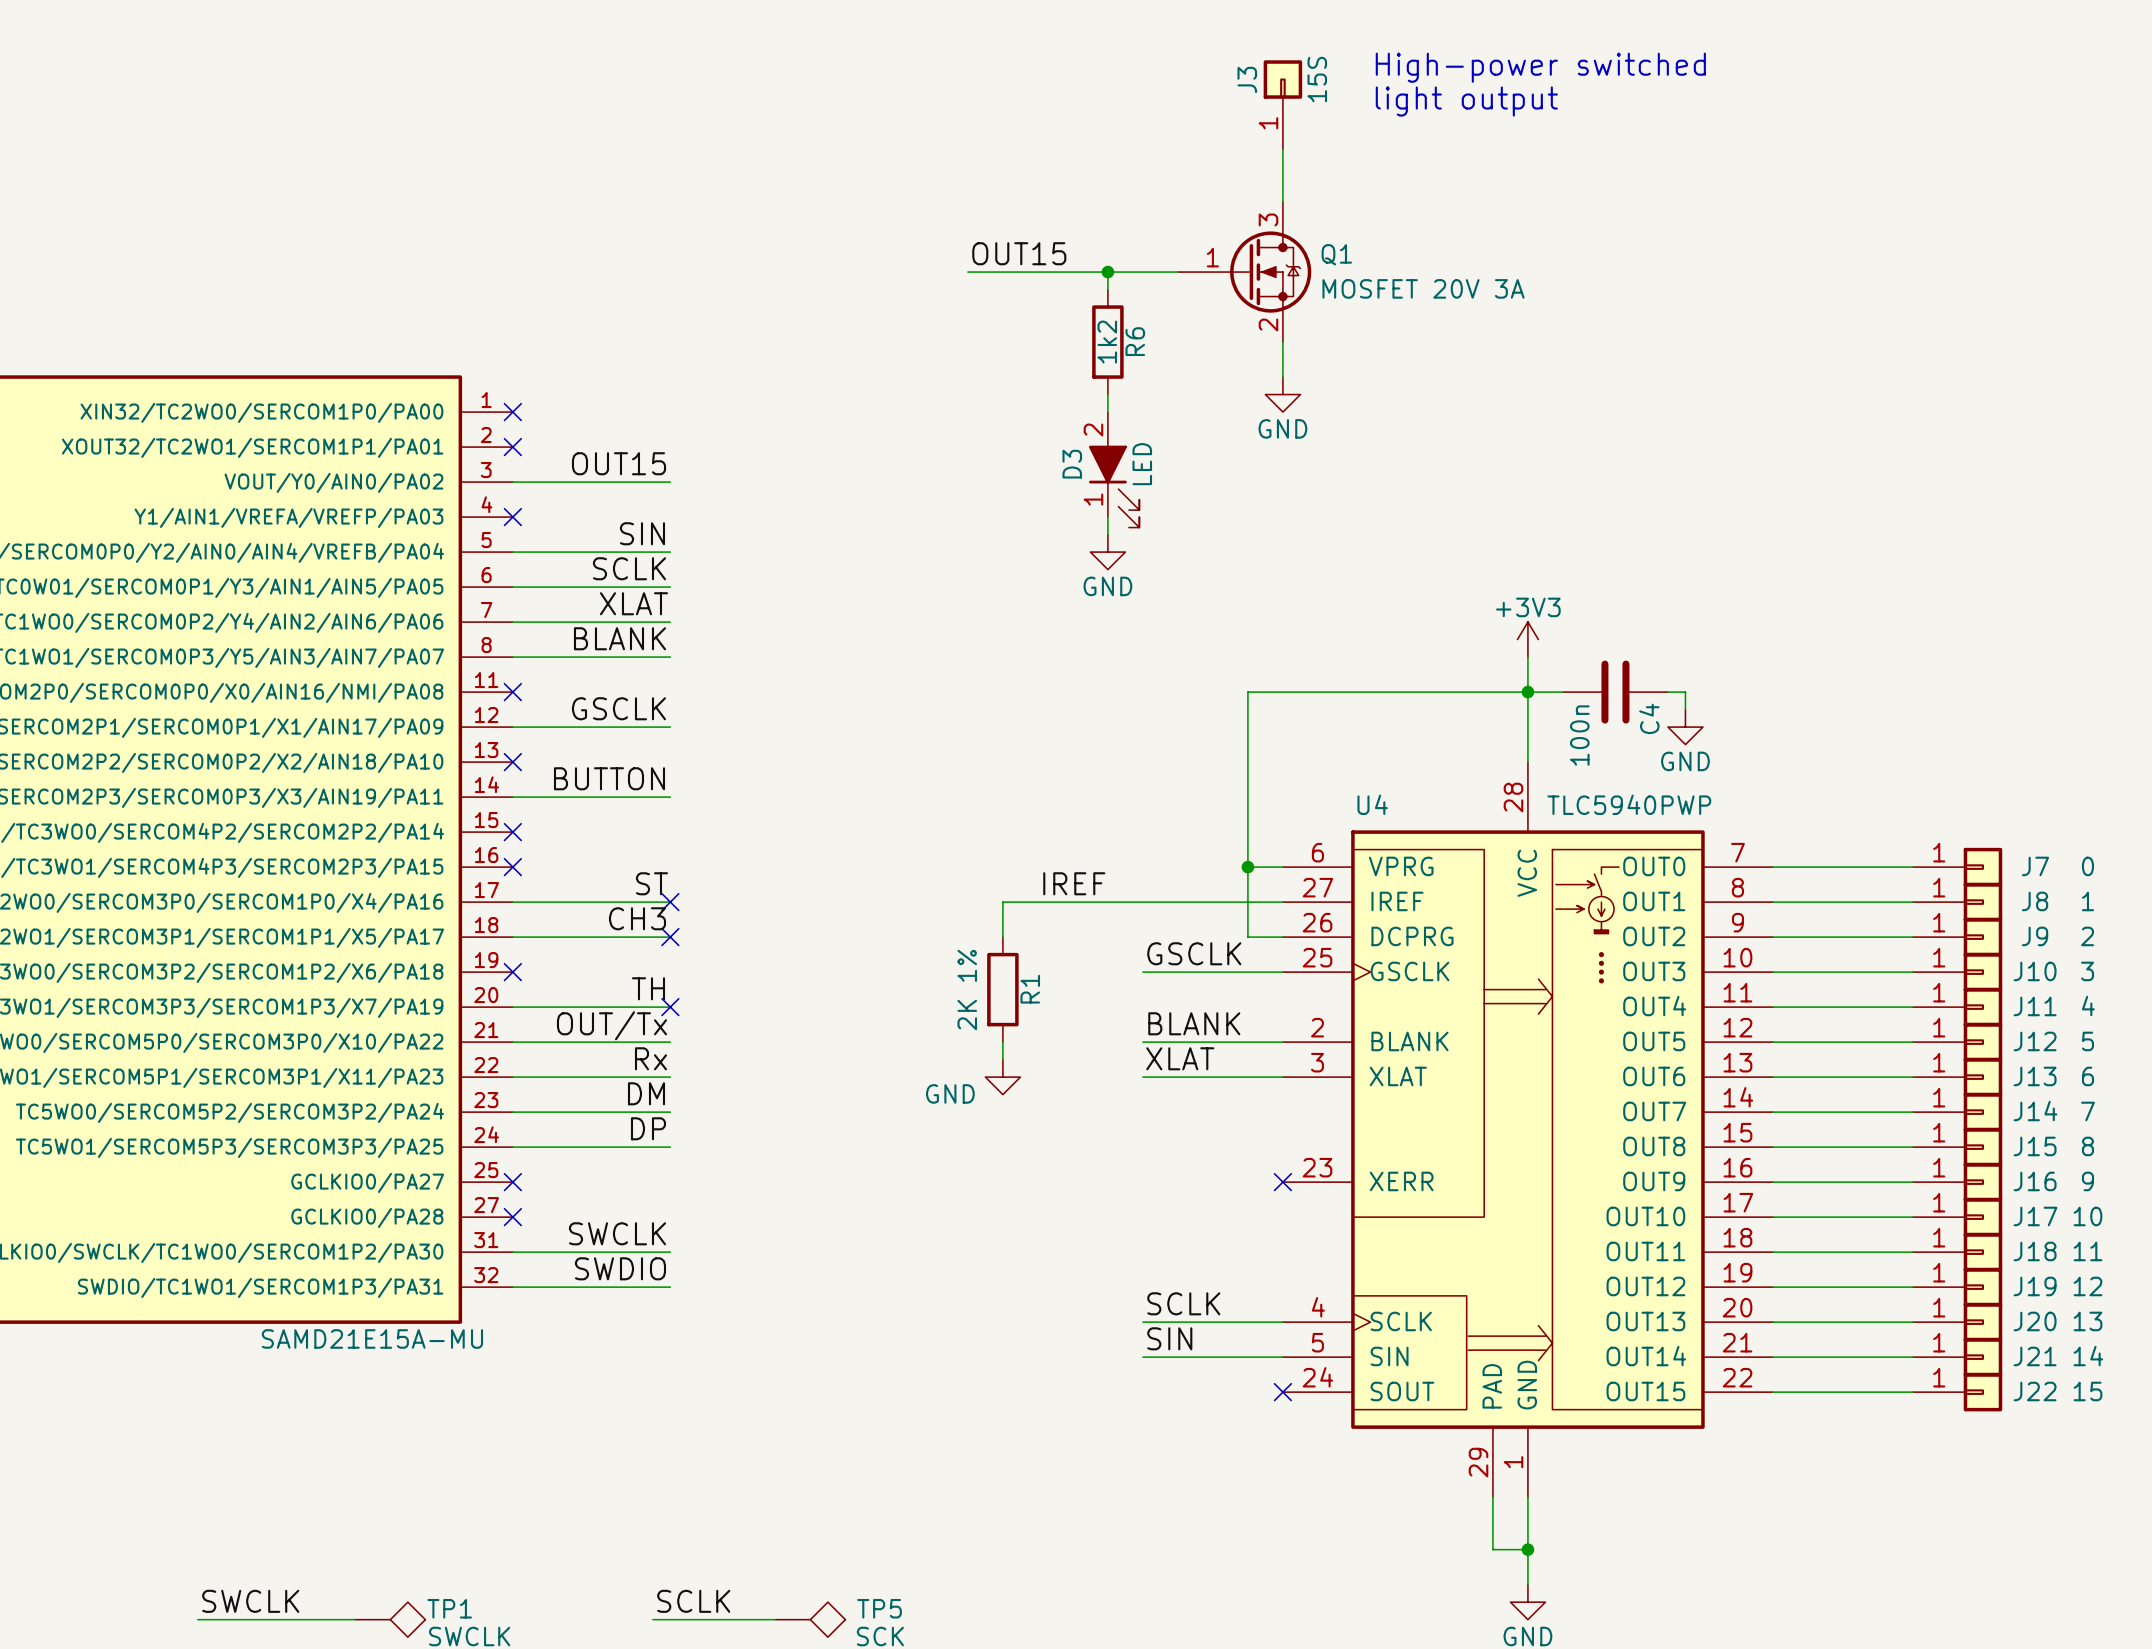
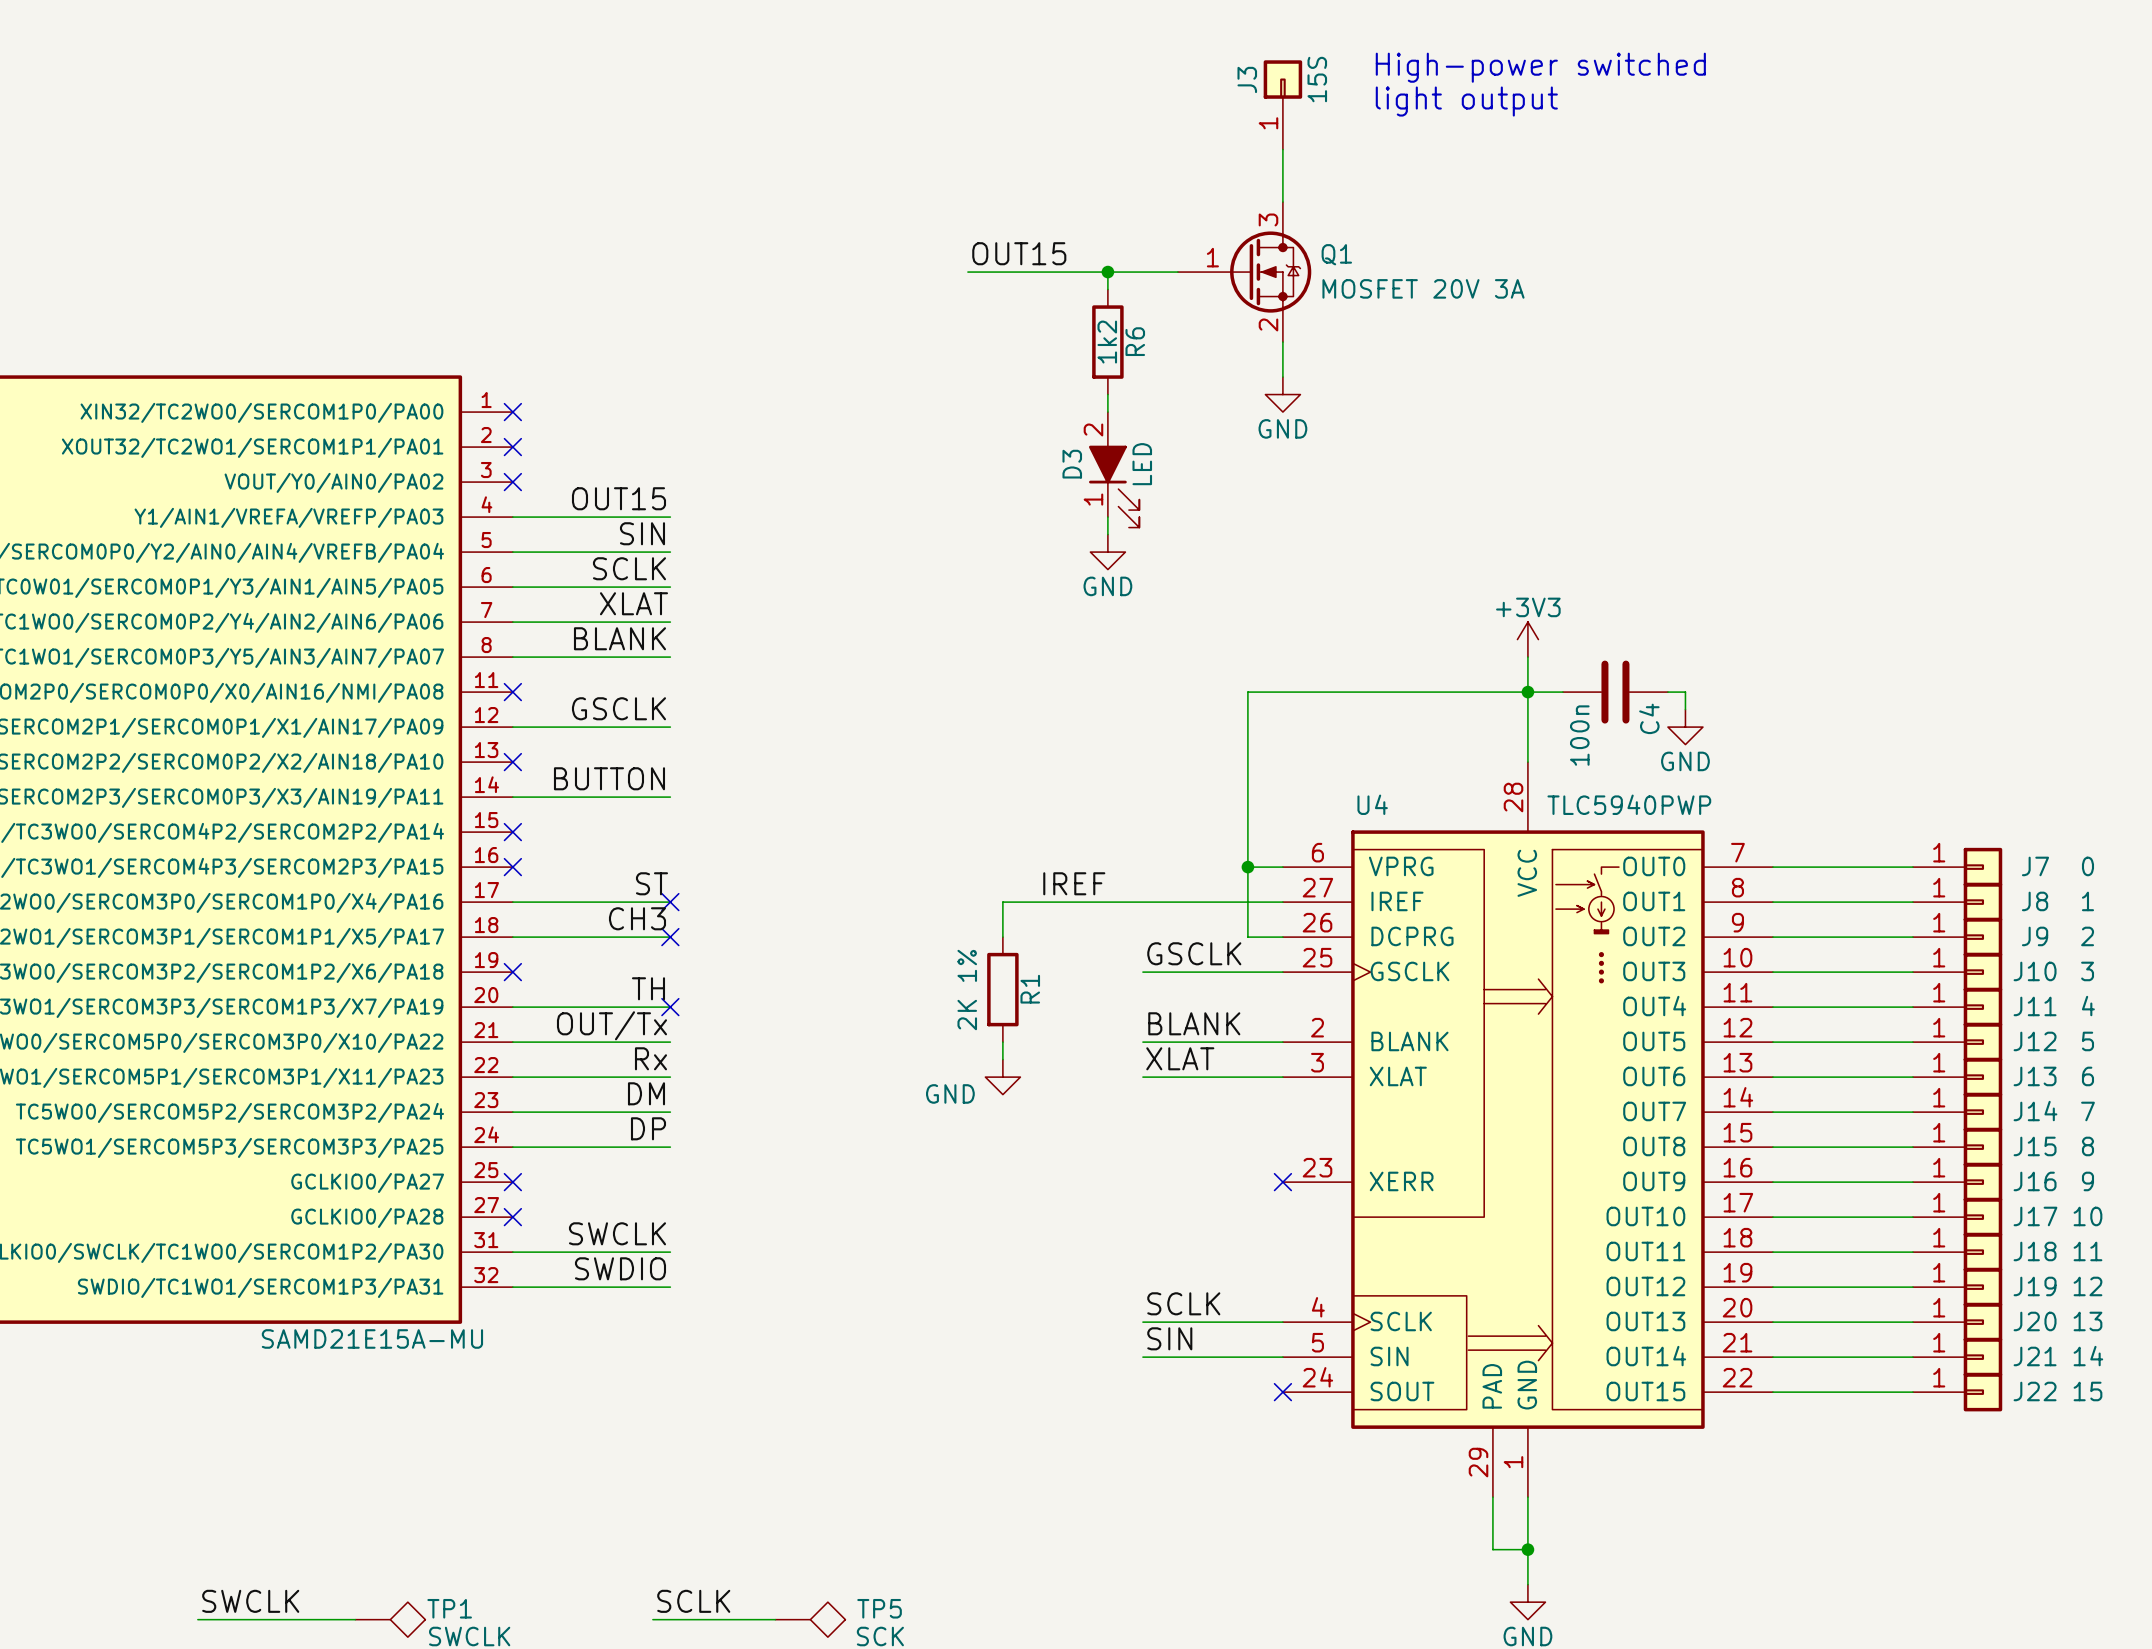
label position: OUT15 (618, 463) -> OUT15 (618, 498)
wire: (512, 482) (670, 482) -> (512, 517) (670, 517)
no-connect mark position: (512, 517) -> (512, 482)

